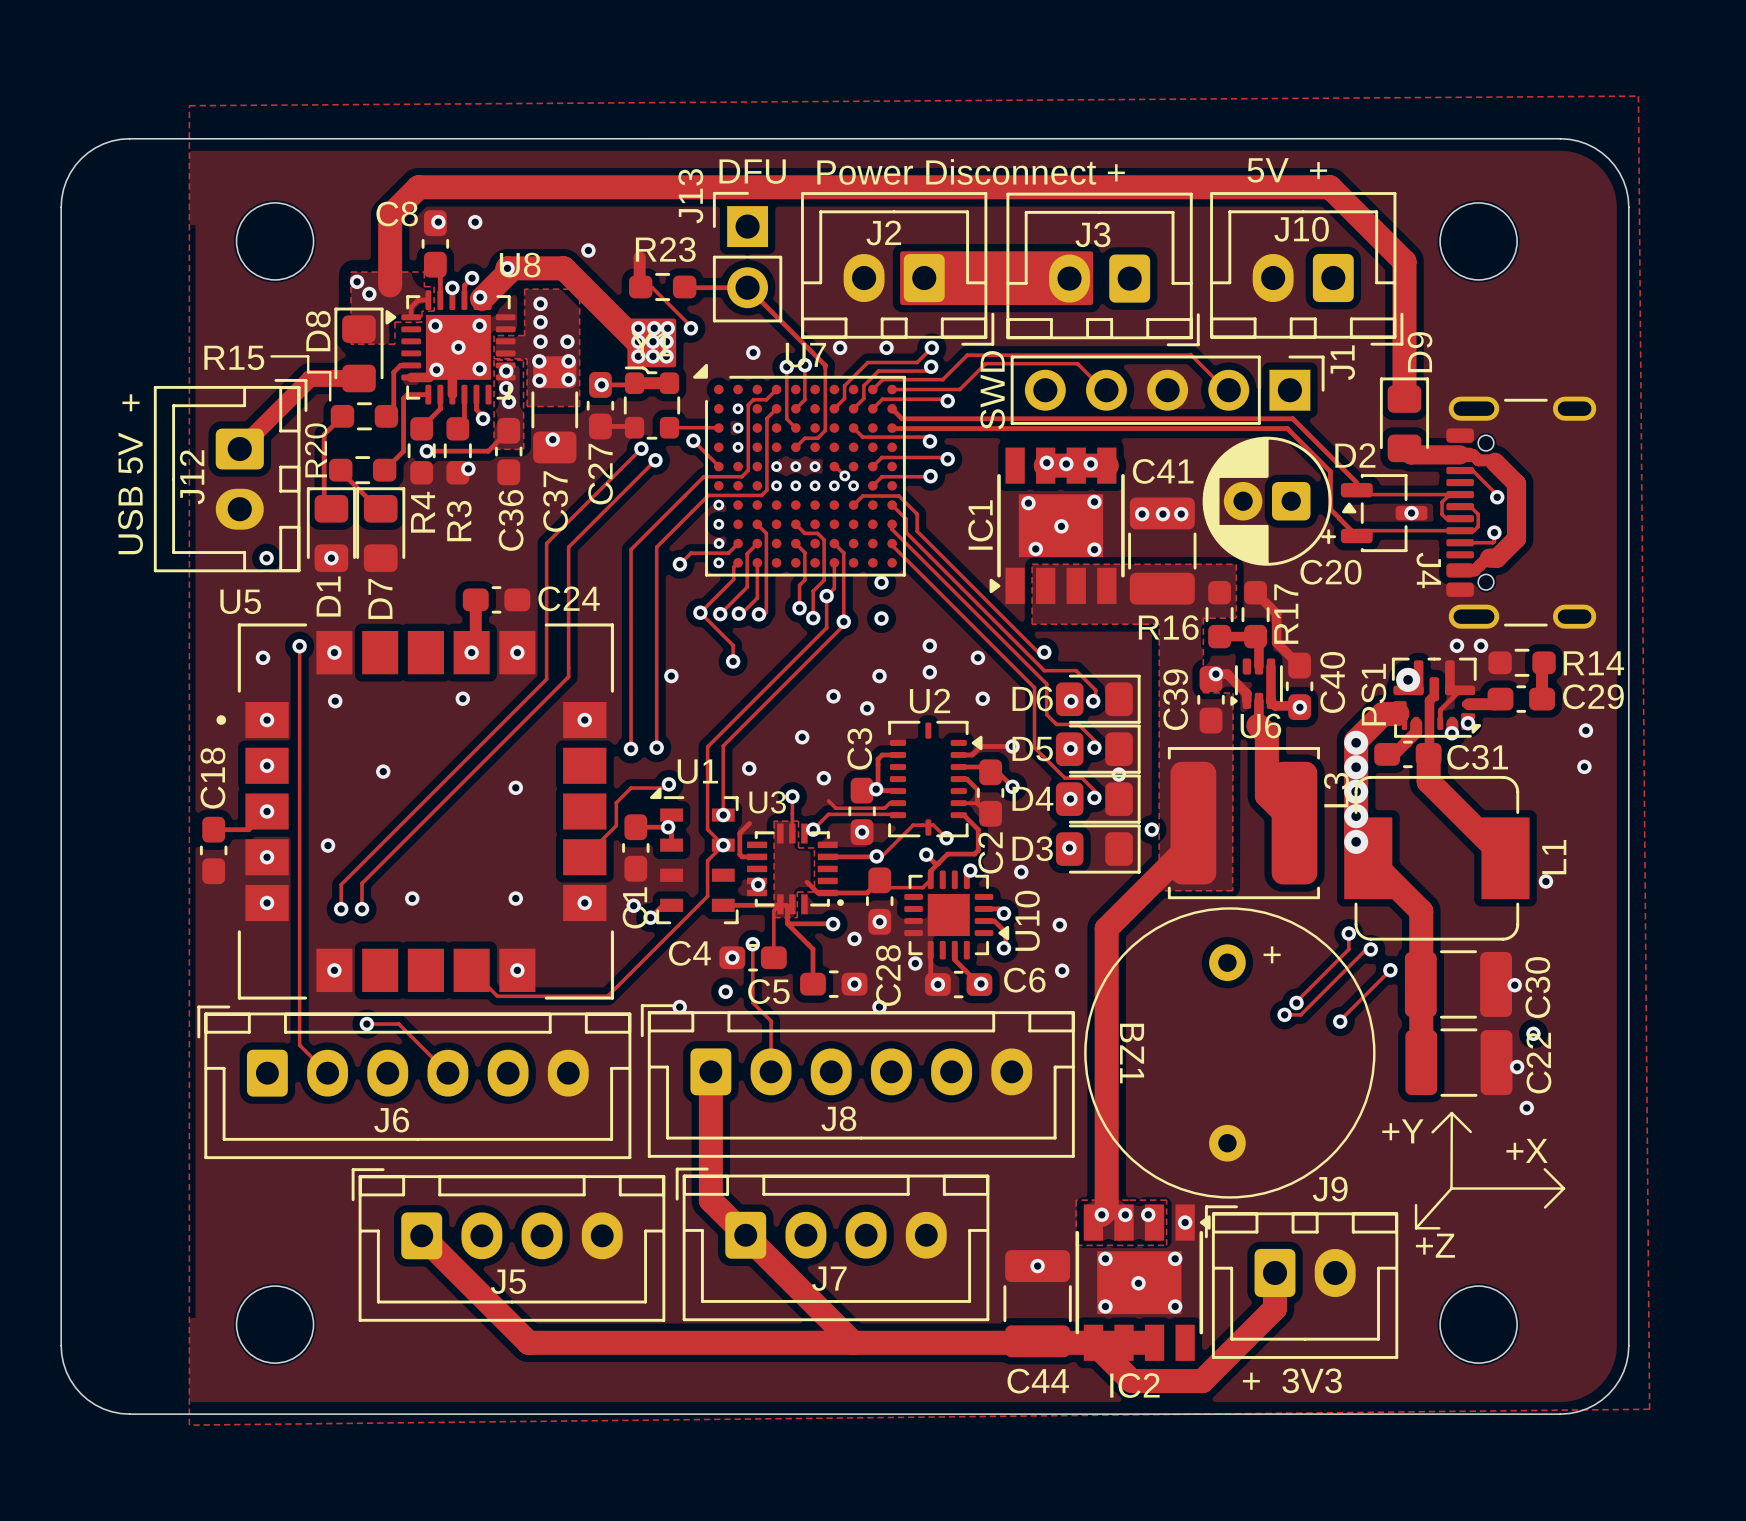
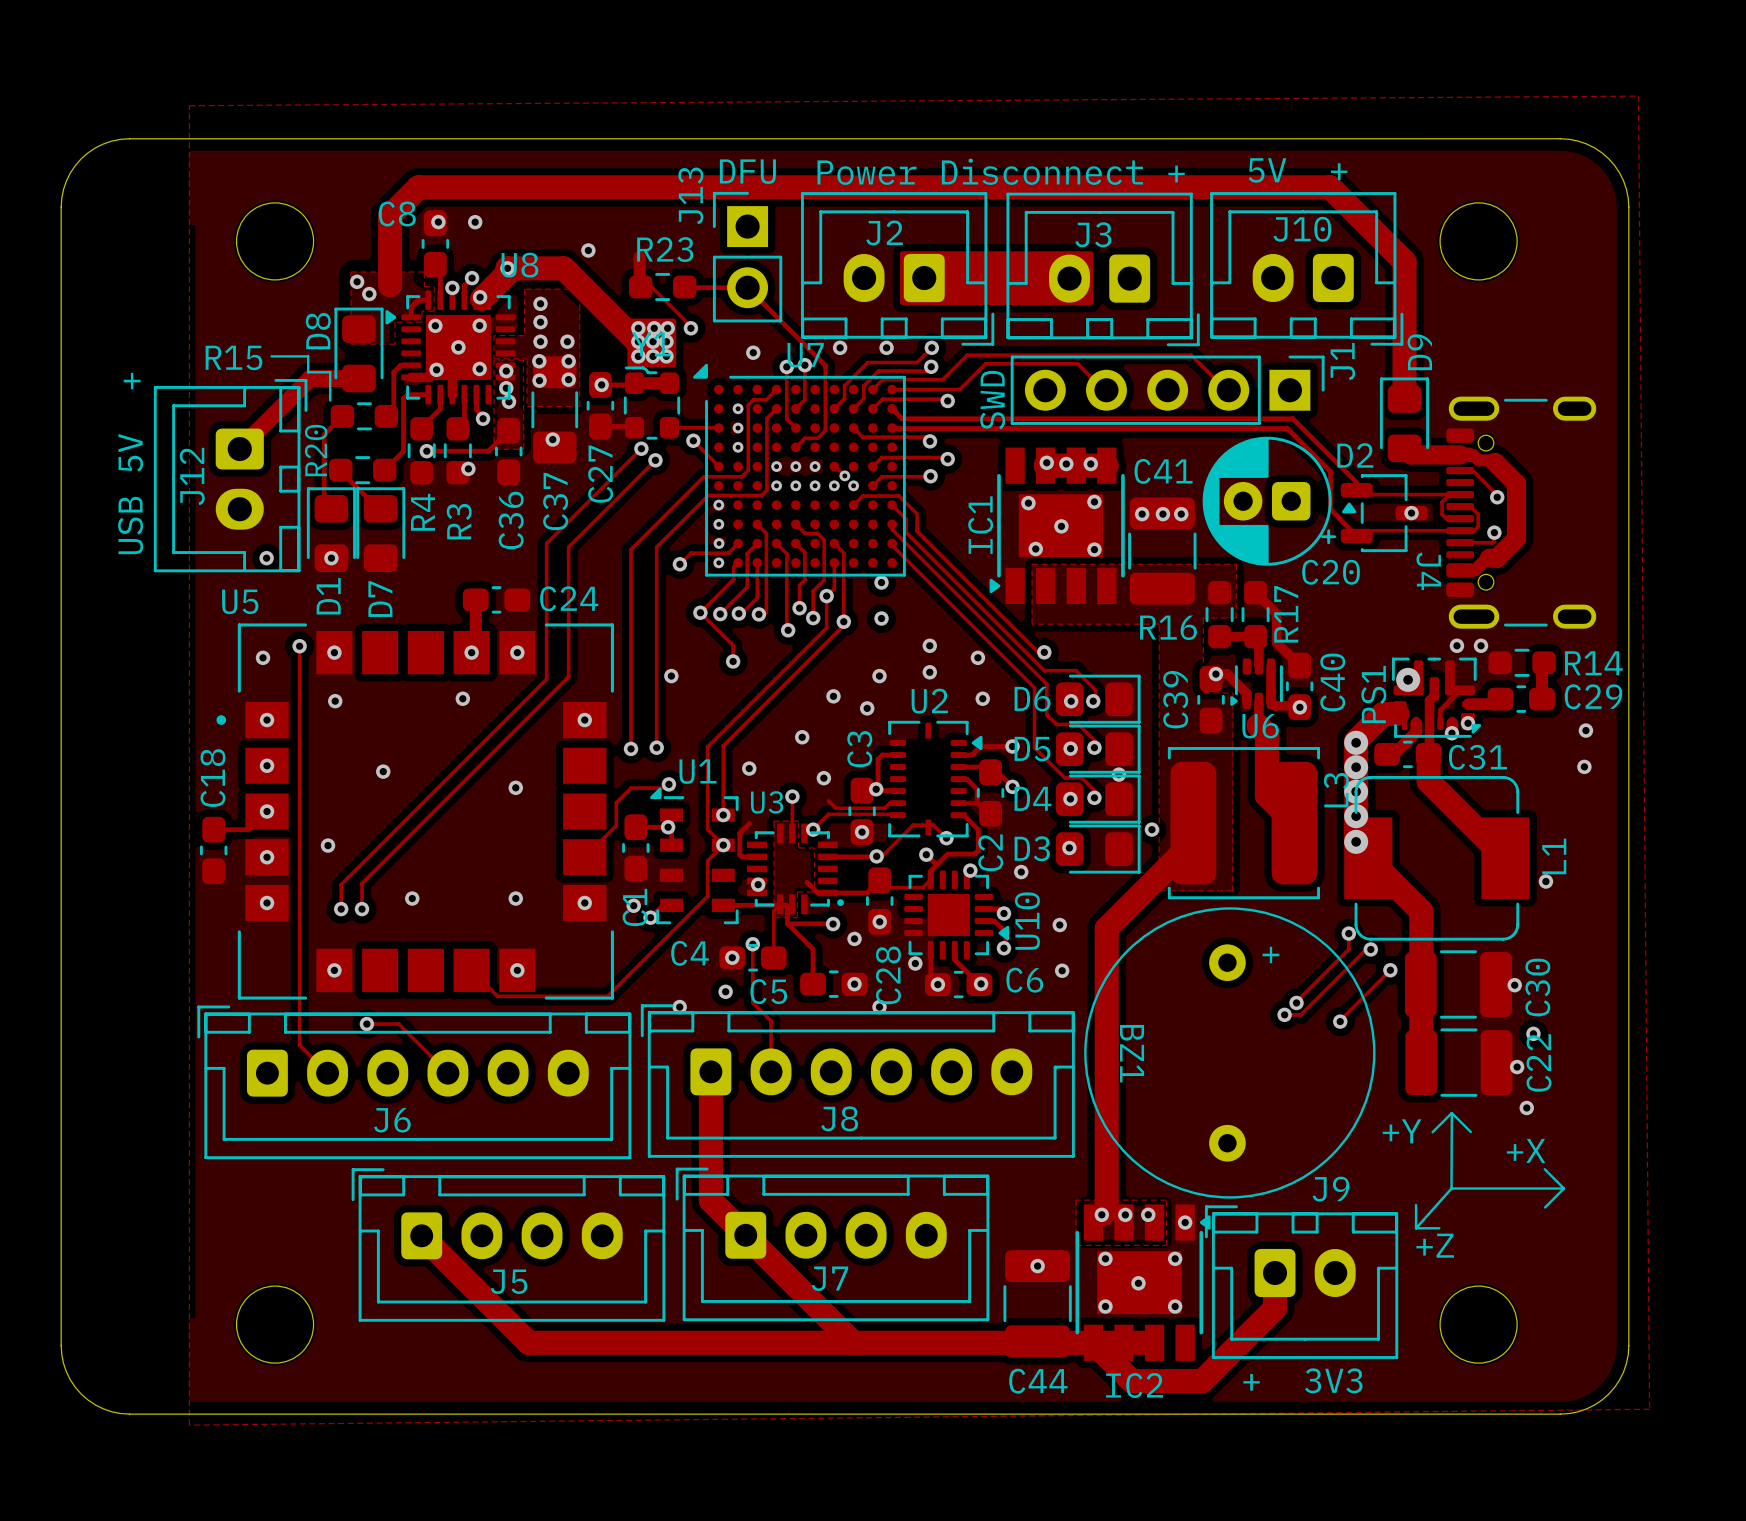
track: none -> (776, 543) (787, 554) (788, 630)
via: none -> (788, 630)

